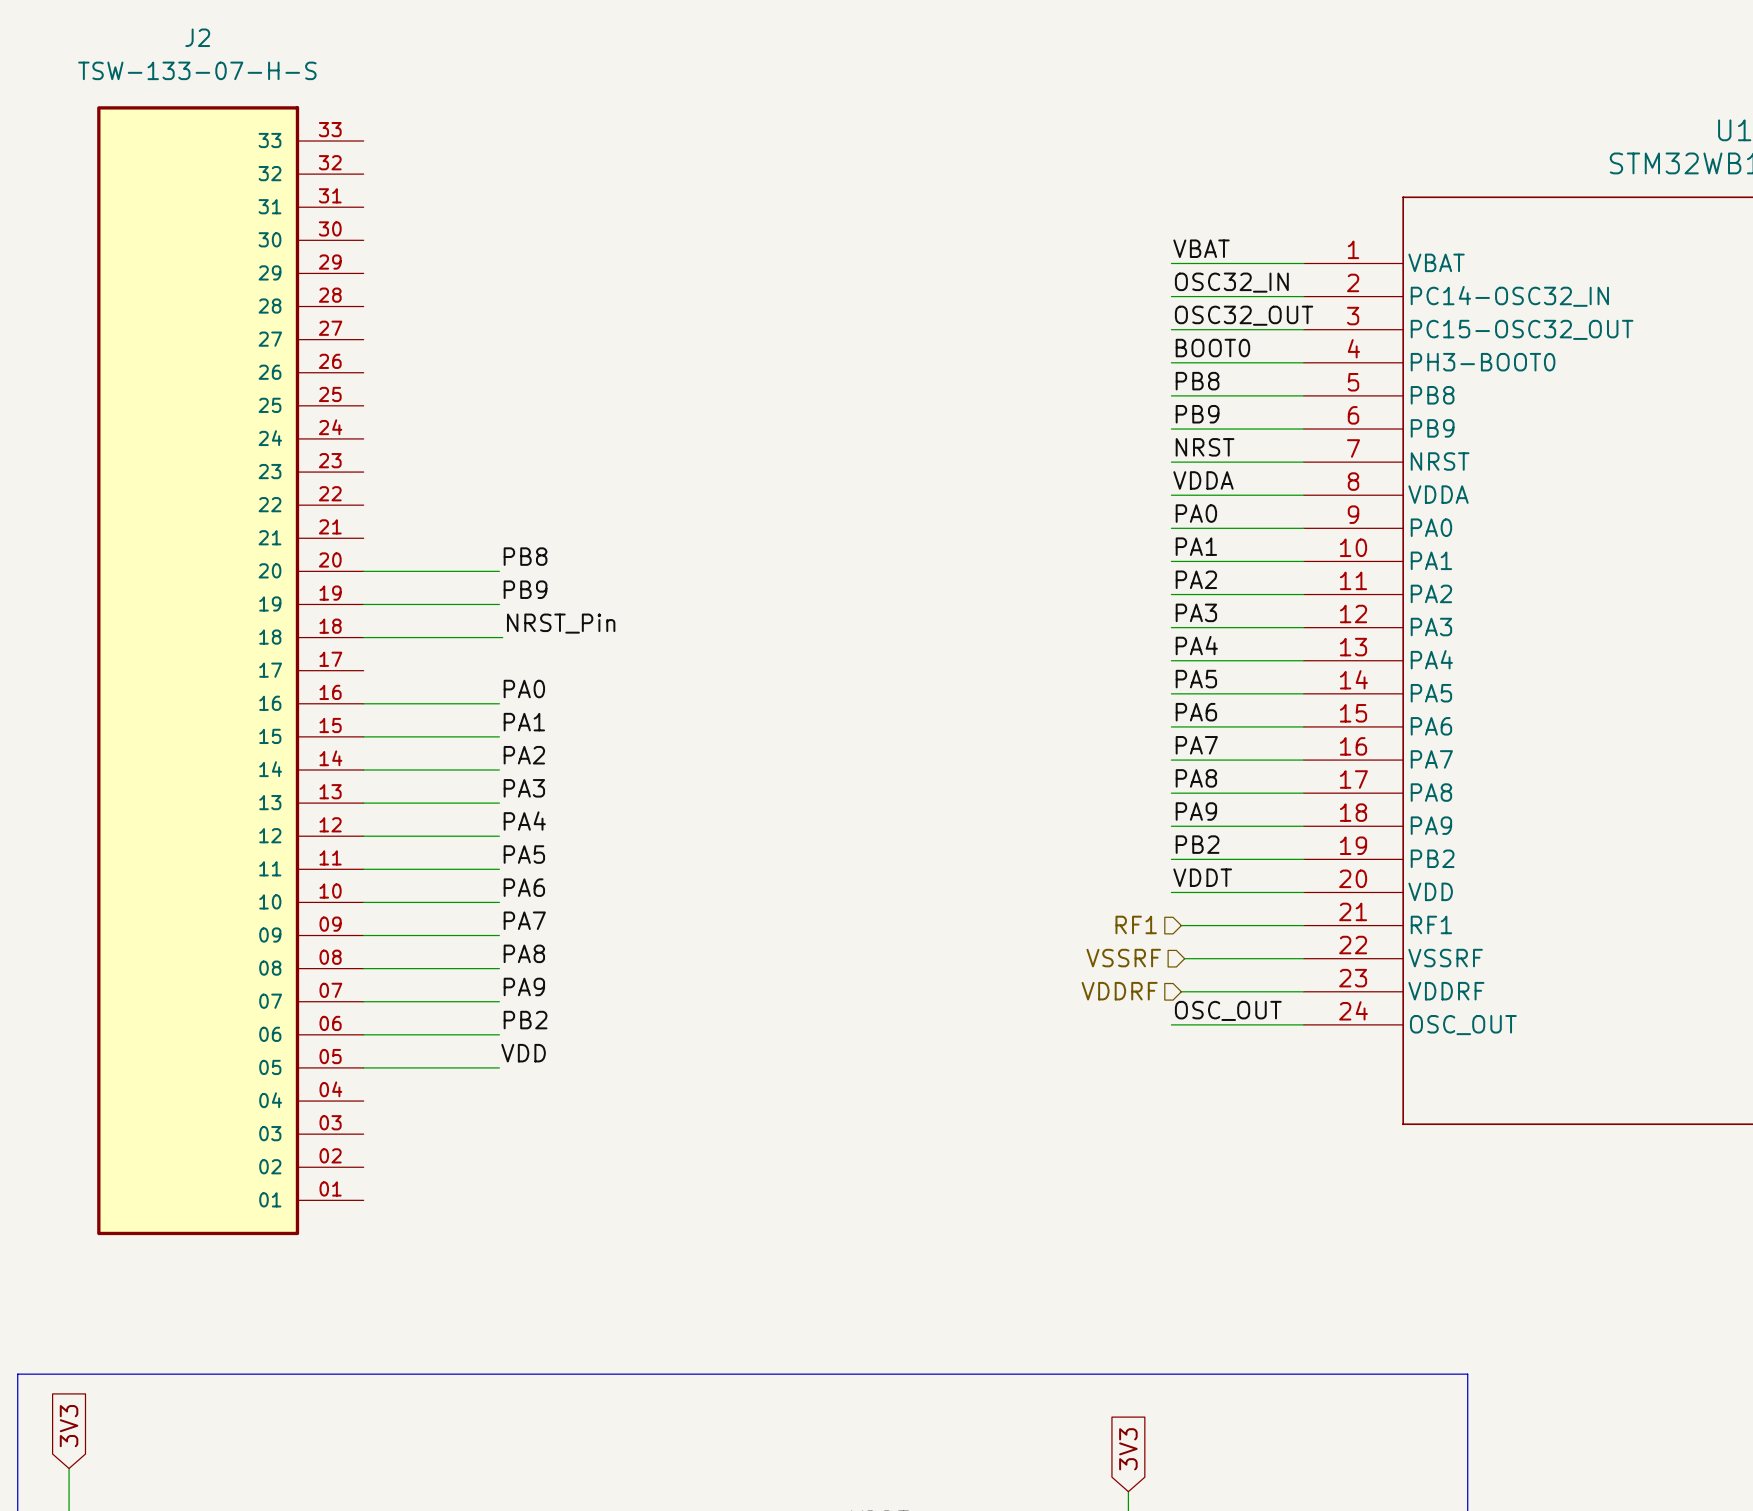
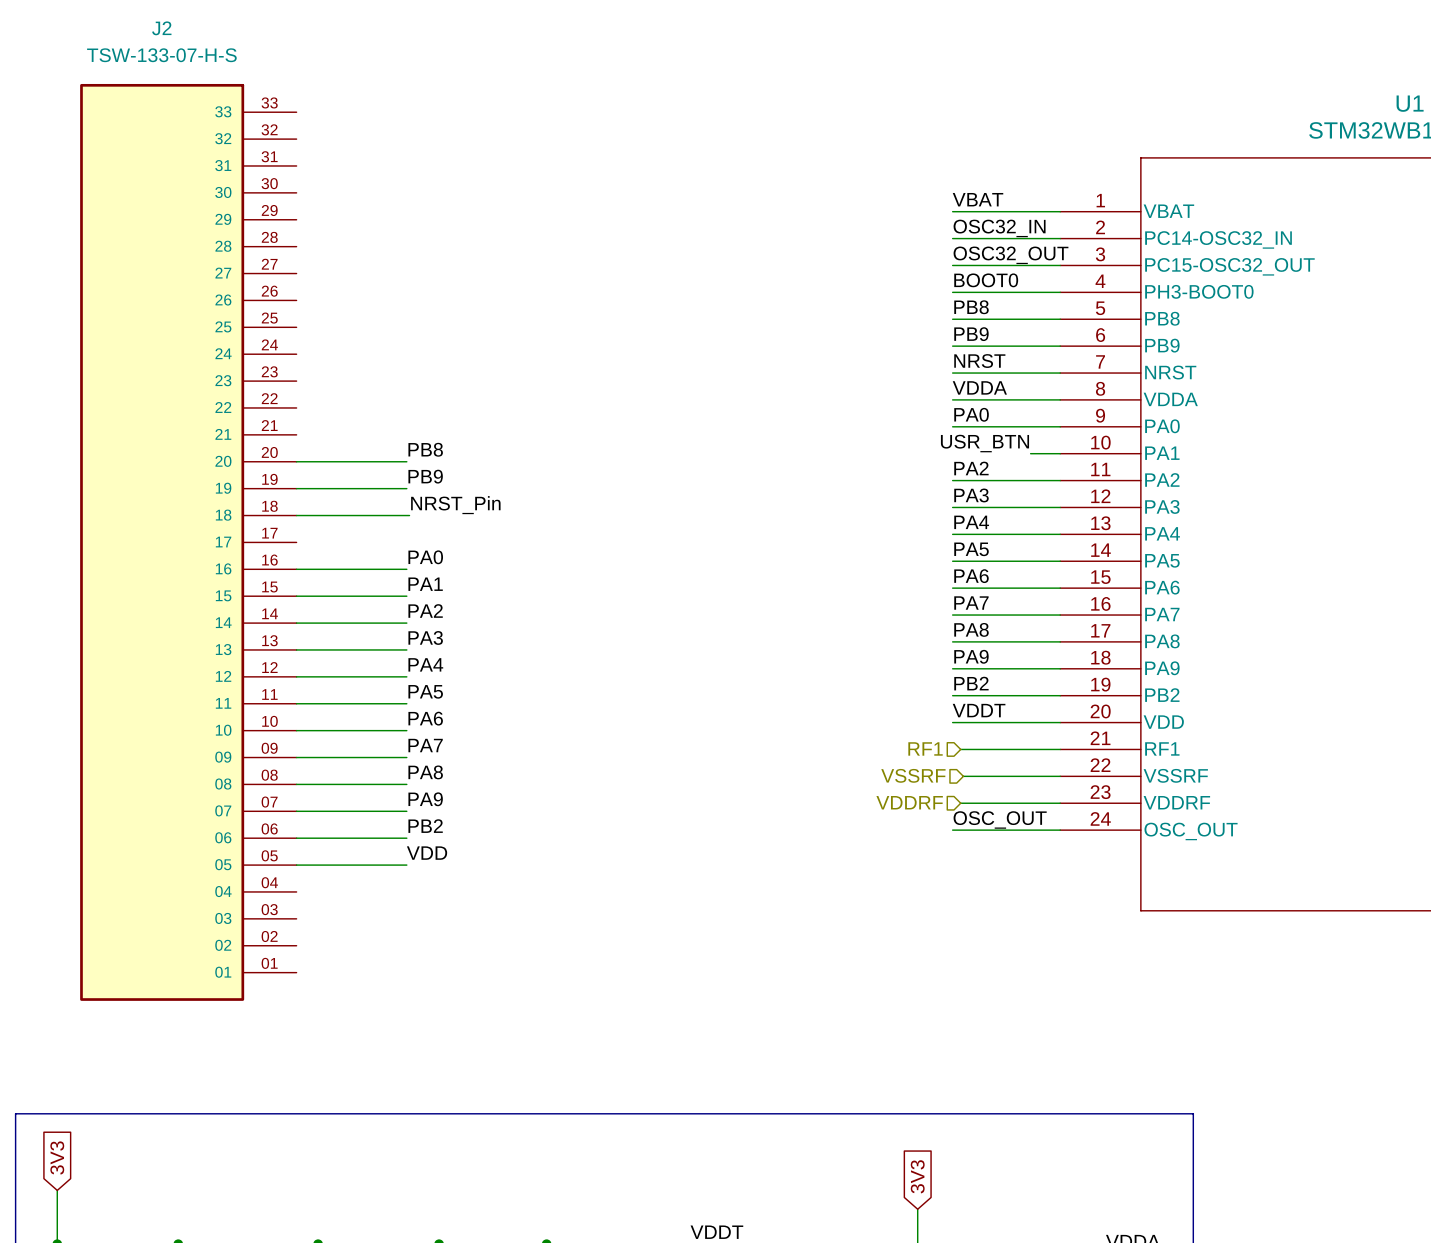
label: PA1 (1196, 546) -> none
label: none -> USR_BTN (984, 443)
wire: (1171, 561) (1267, 561) -> none

